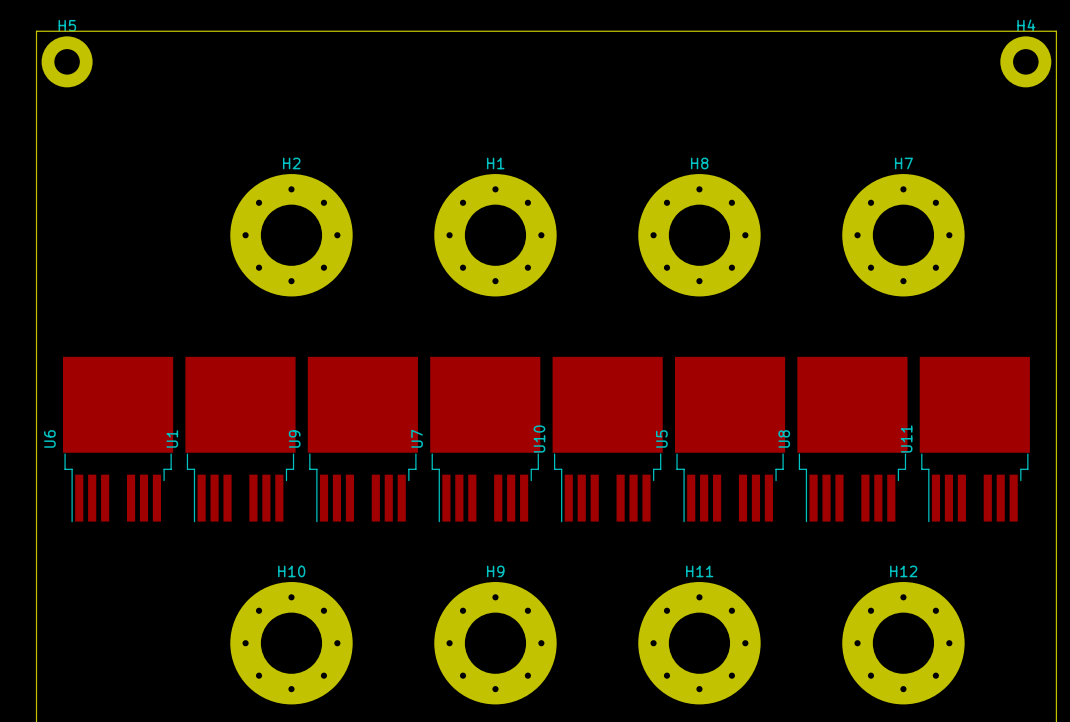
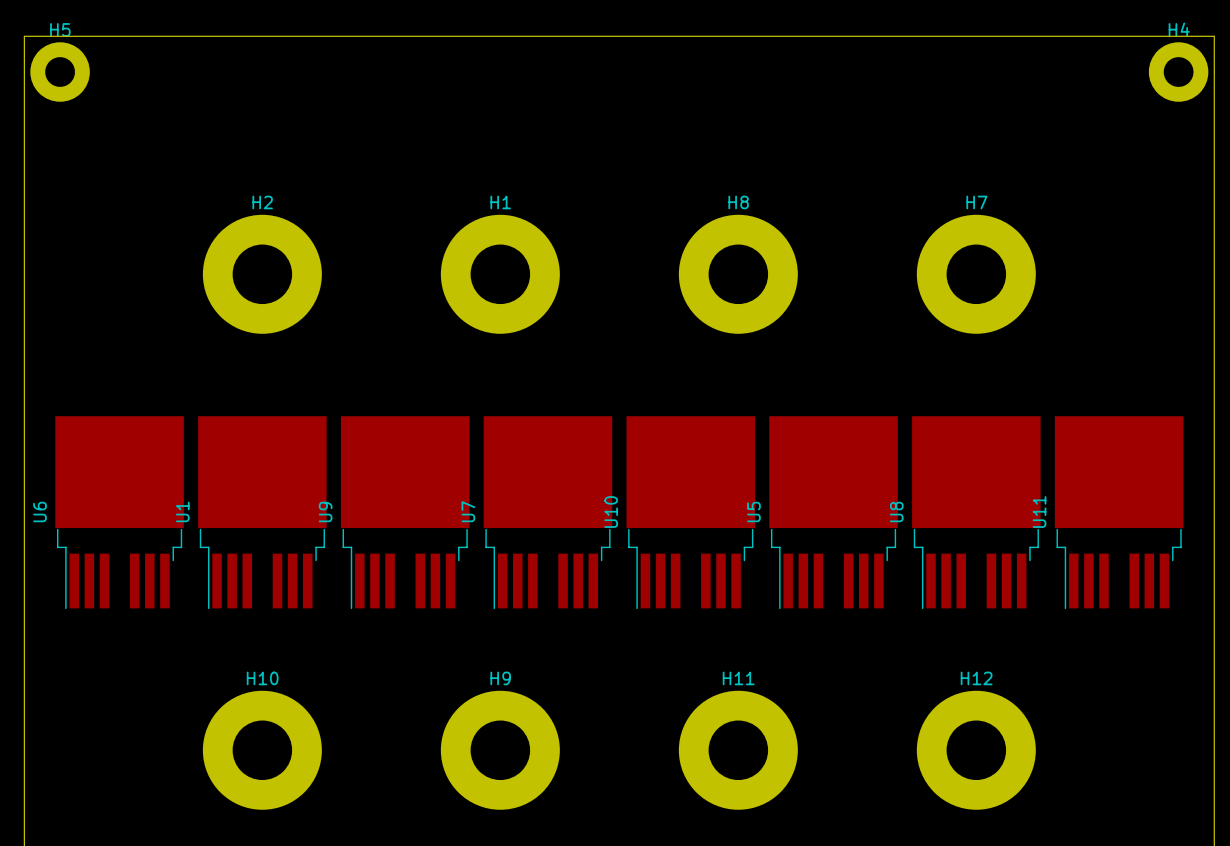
H2 footprint: [230, 174, 353, 297] -> [202, 214, 322, 334]
H1 footprint: [434, 174, 557, 297] -> [440, 214, 560, 334]
H8 footprint: [638, 174, 761, 297] -> [678, 214, 798, 334]
H7 footprint: [842, 174, 965, 297] -> [916, 214, 1036, 334]
H10 footprint: [230, 582, 353, 705] -> [202, 690, 322, 810]
H9 footprint: [434, 582, 557, 705] -> [440, 690, 560, 810]
H11 footprint: [638, 582, 761, 705] -> [678, 690, 798, 810]
H12 footprint: [842, 582, 965, 705] -> [916, 690, 1036, 810]

